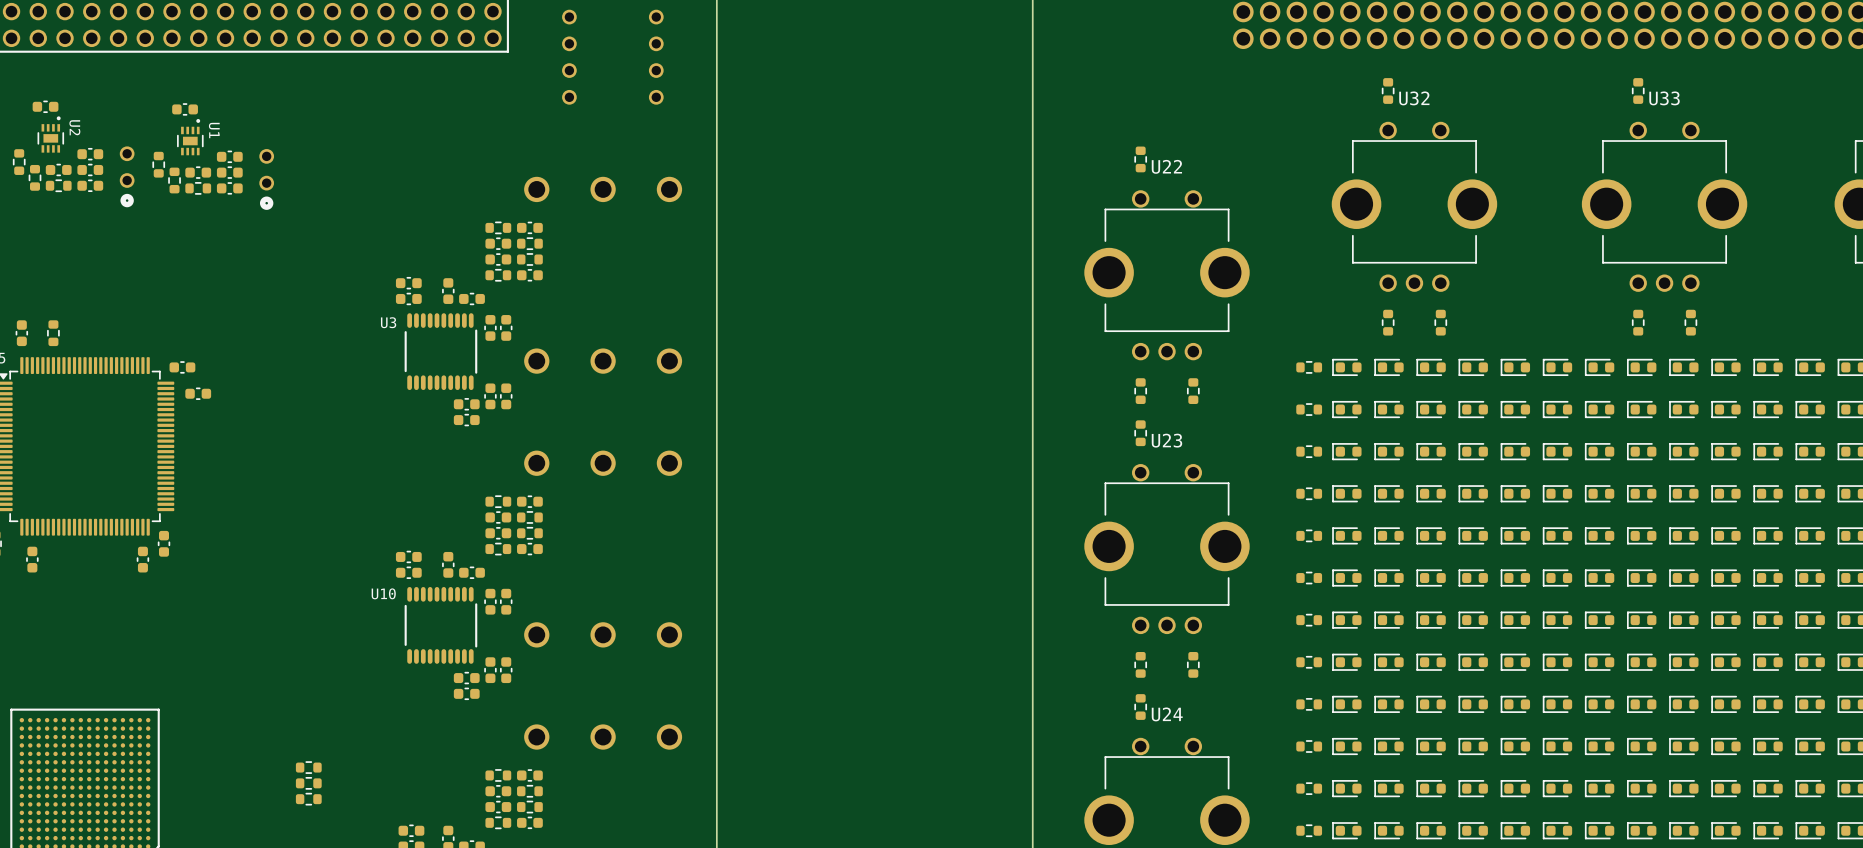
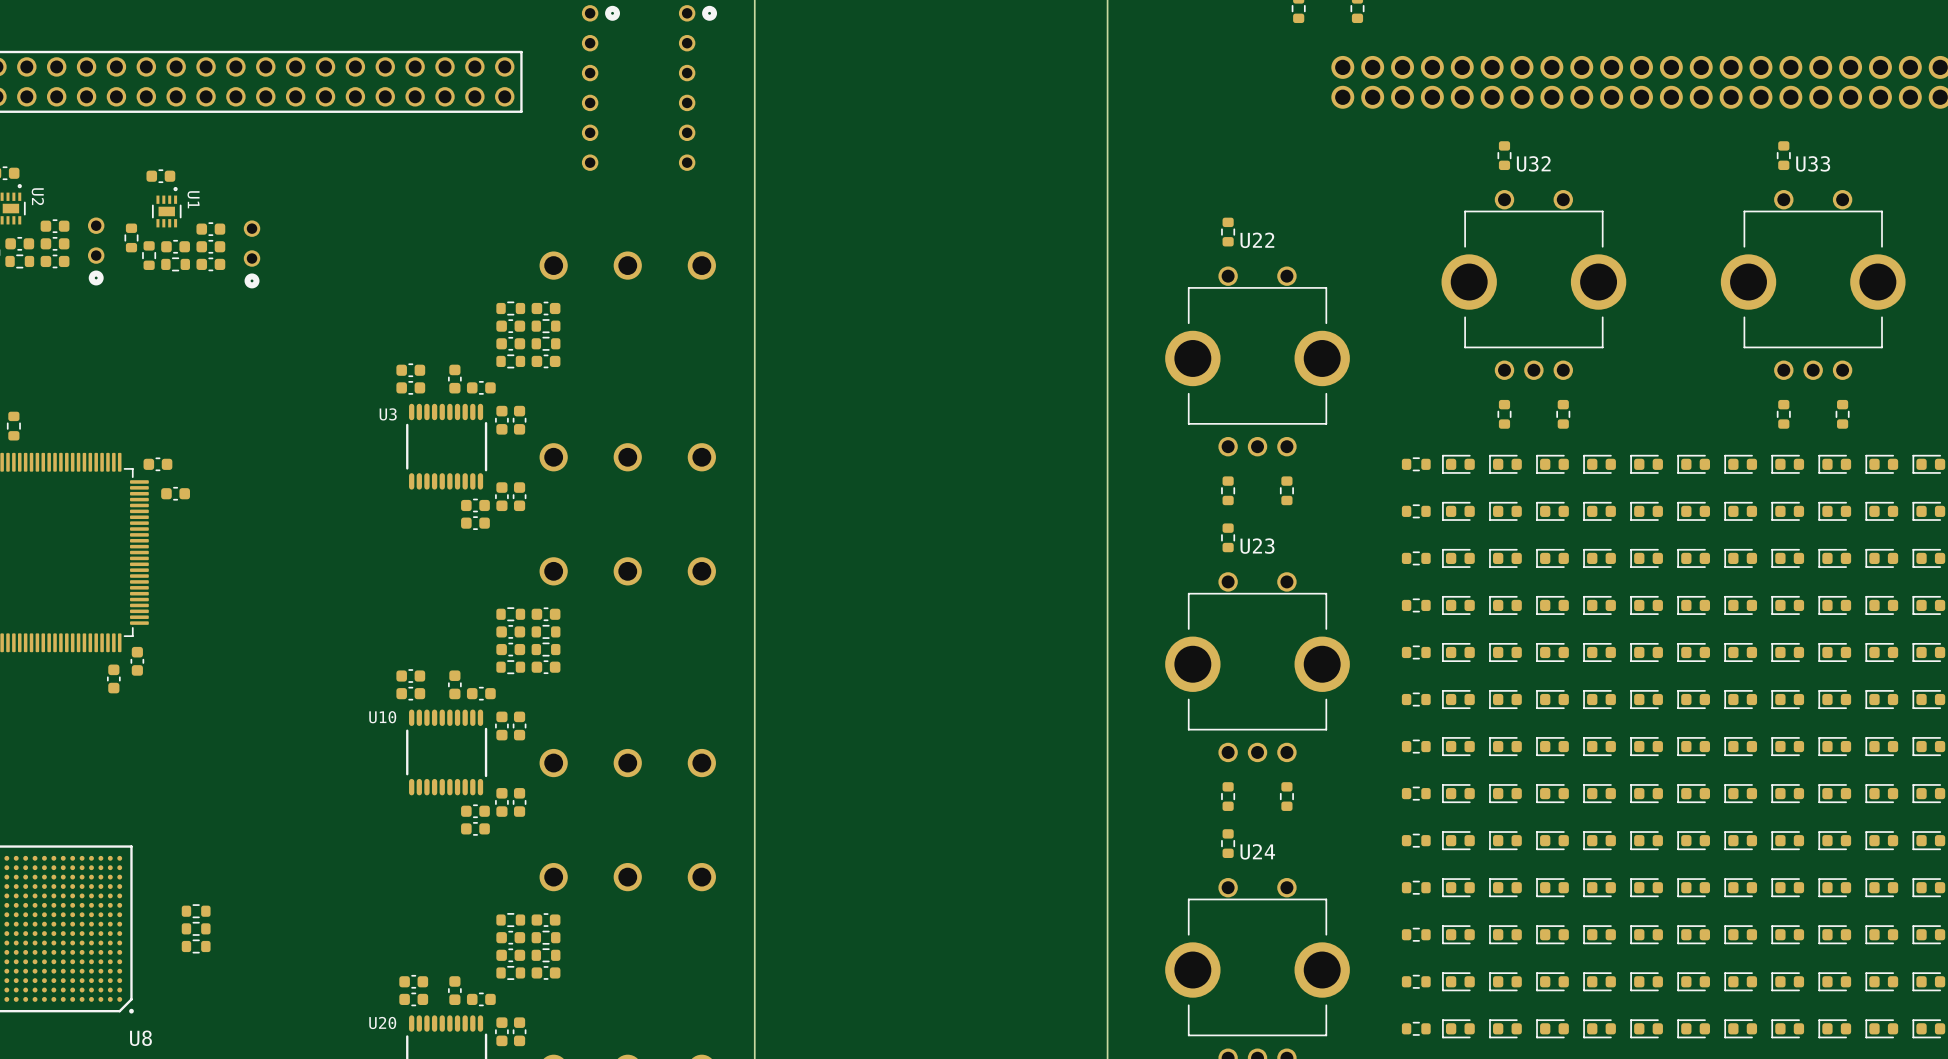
part: none -> (196, 911)
part: (308, 767) -> none
part: none -> (196, 928)
part: (308, 783) -> none
part: none -> (196, 946)
part: (308, 799) -> none

